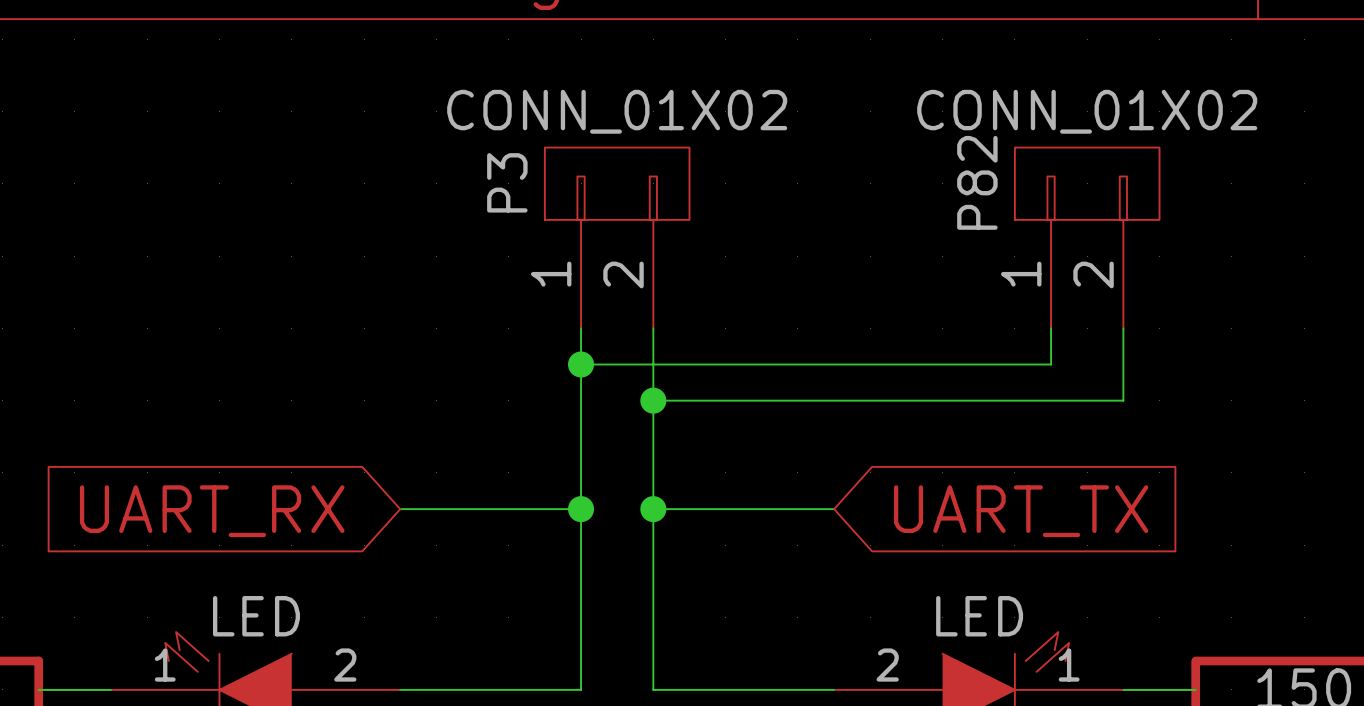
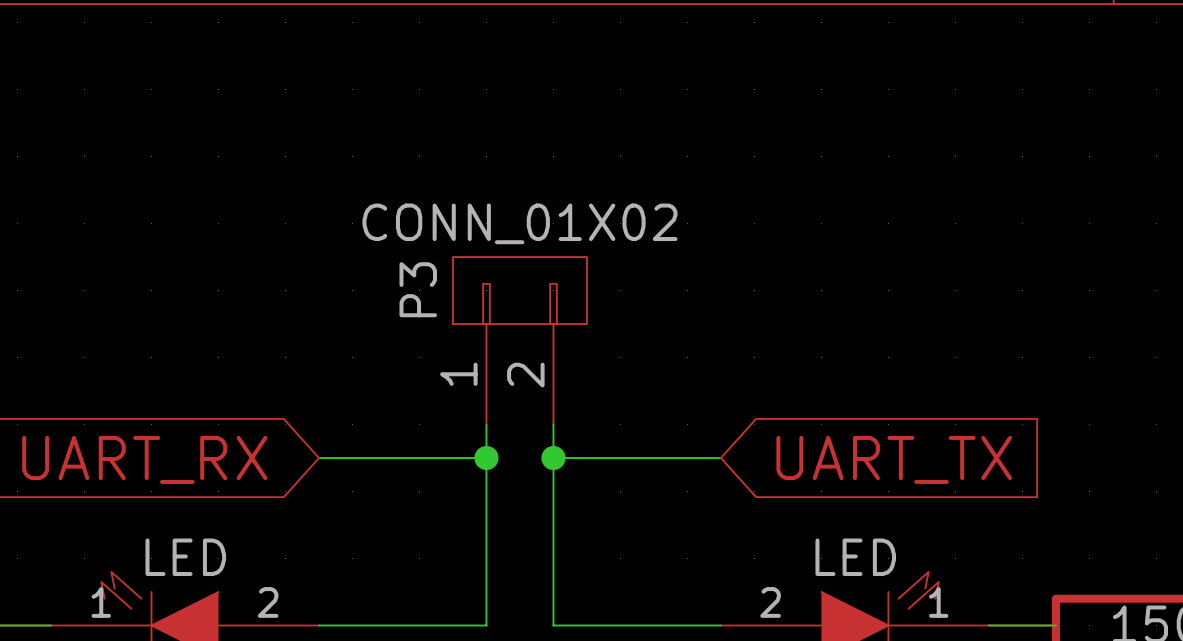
P3 position: (617, 237) -> (519, 340)
P82: CONN_01X02 (1087, 237) -> none
wire: (1051, 328) (1051, 364) (581, 364) -> none
wire: (1123, 328) (1123, 400) (653, 400) -> none
junction: (581, 364) -> none
junction: (653, 400) -> none

